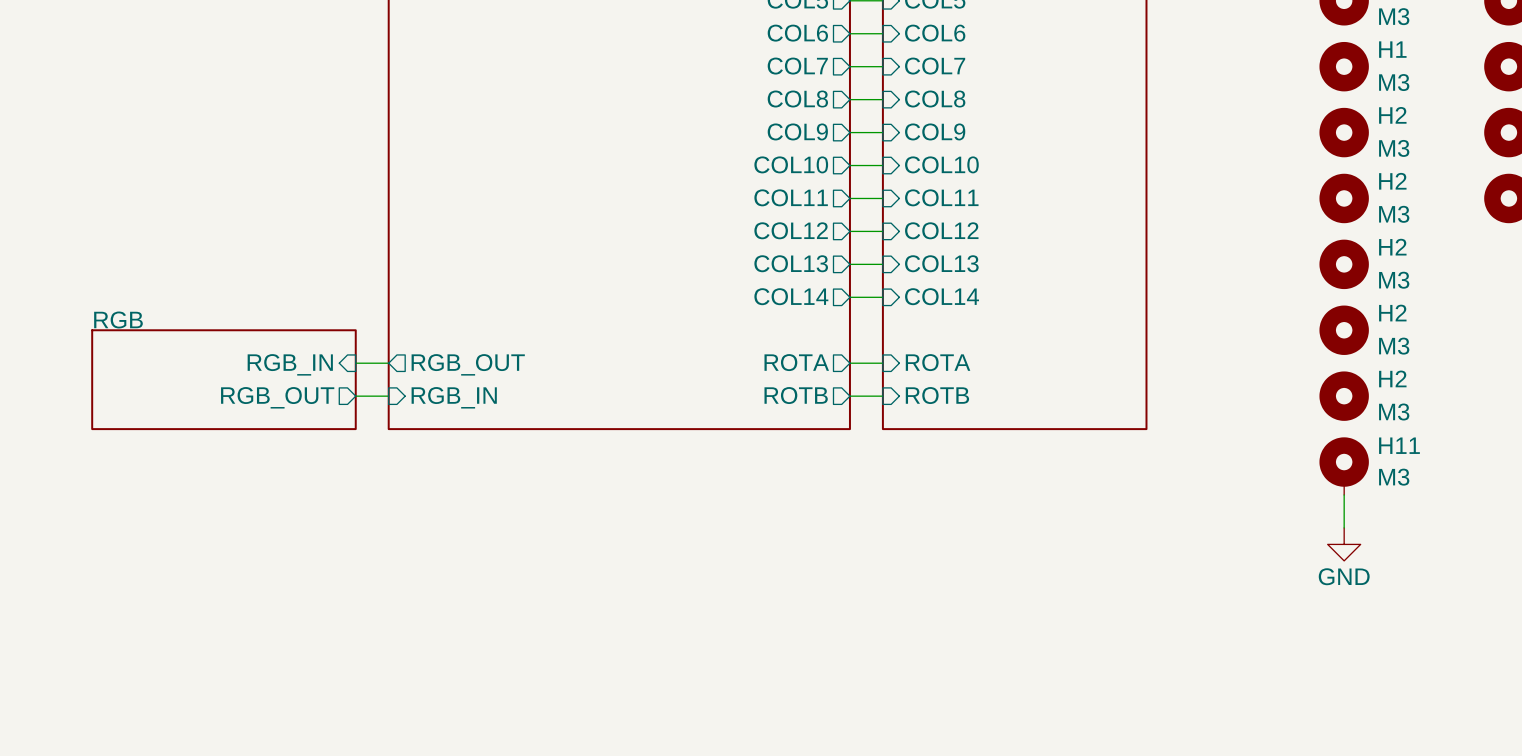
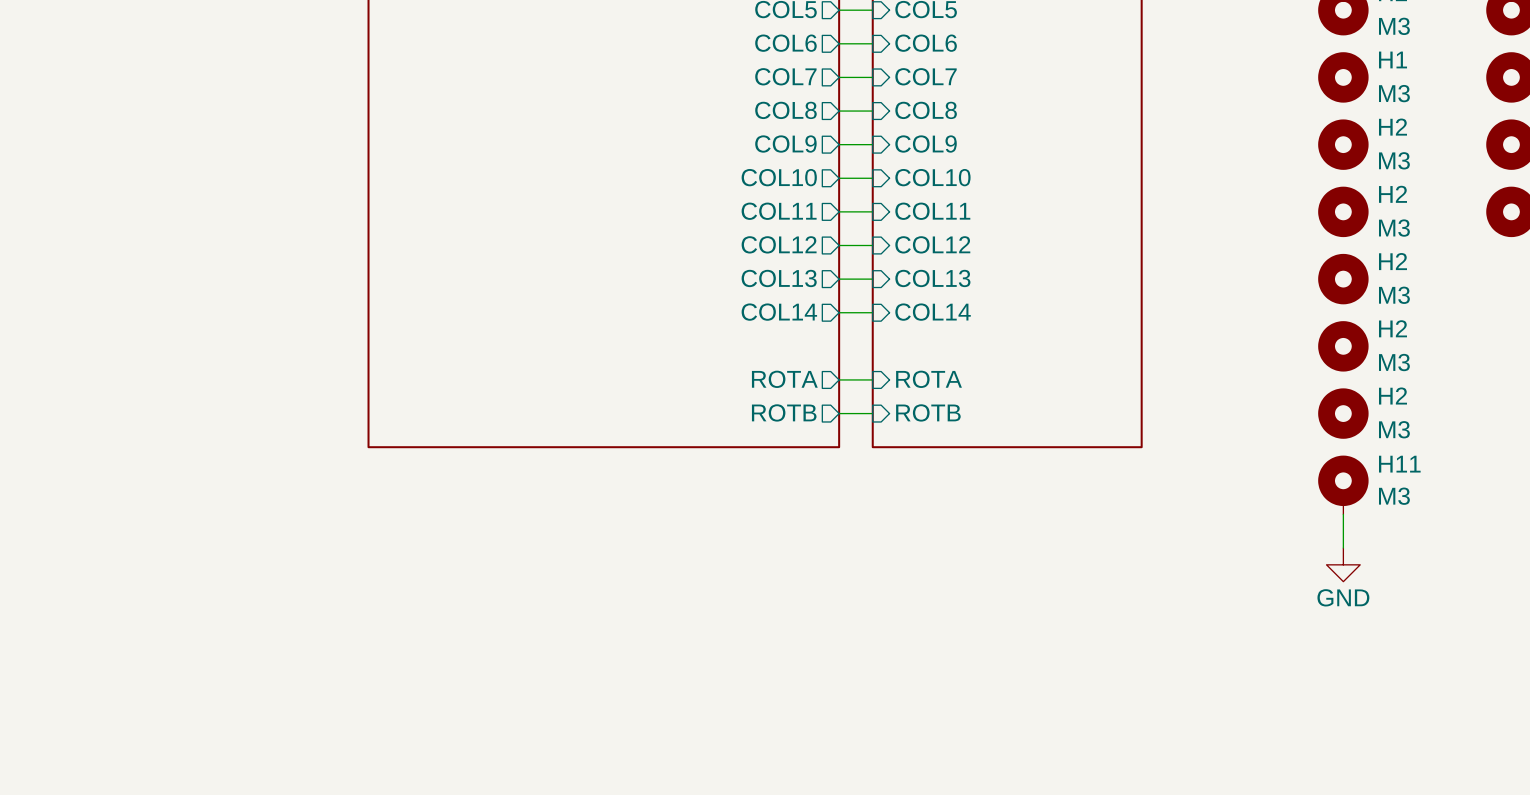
wire: (355, 363) (388, 363) -> none
sheet pin: RGB_IN (290, 364) -> none
sheet pin: RGB_OUT (468, 364) -> none
sheet RGB: (223, 379) -> none
wire: (355, 396) (388, 396) -> none
sheet pin: RGB_OUT (277, 397) -> none
sheet pin: RGB_IN (454, 397) -> none

